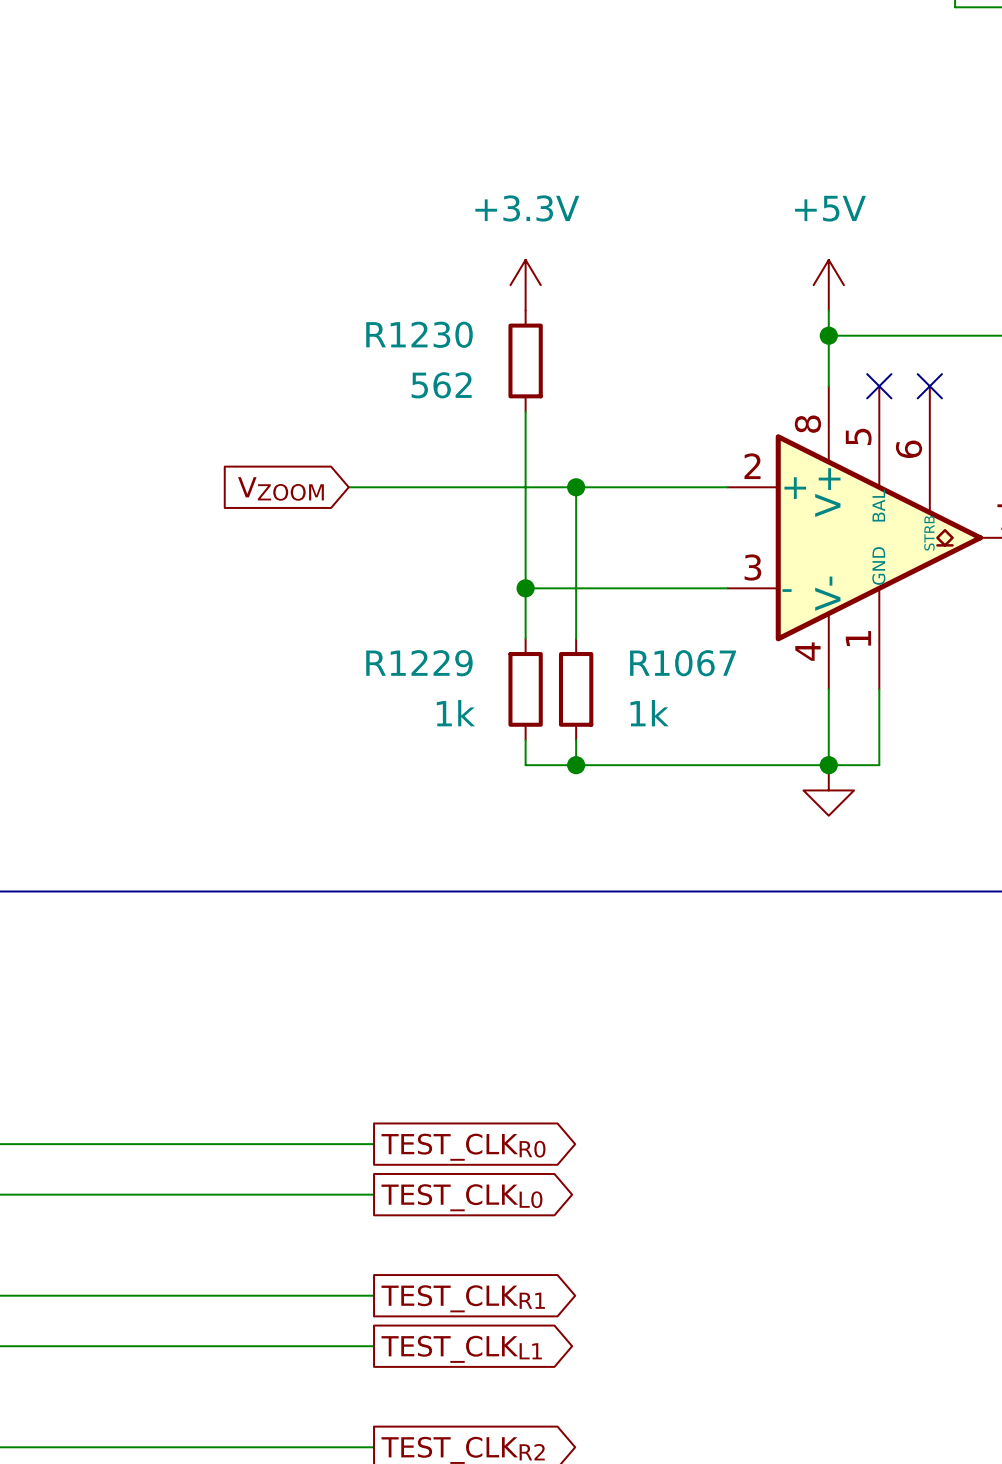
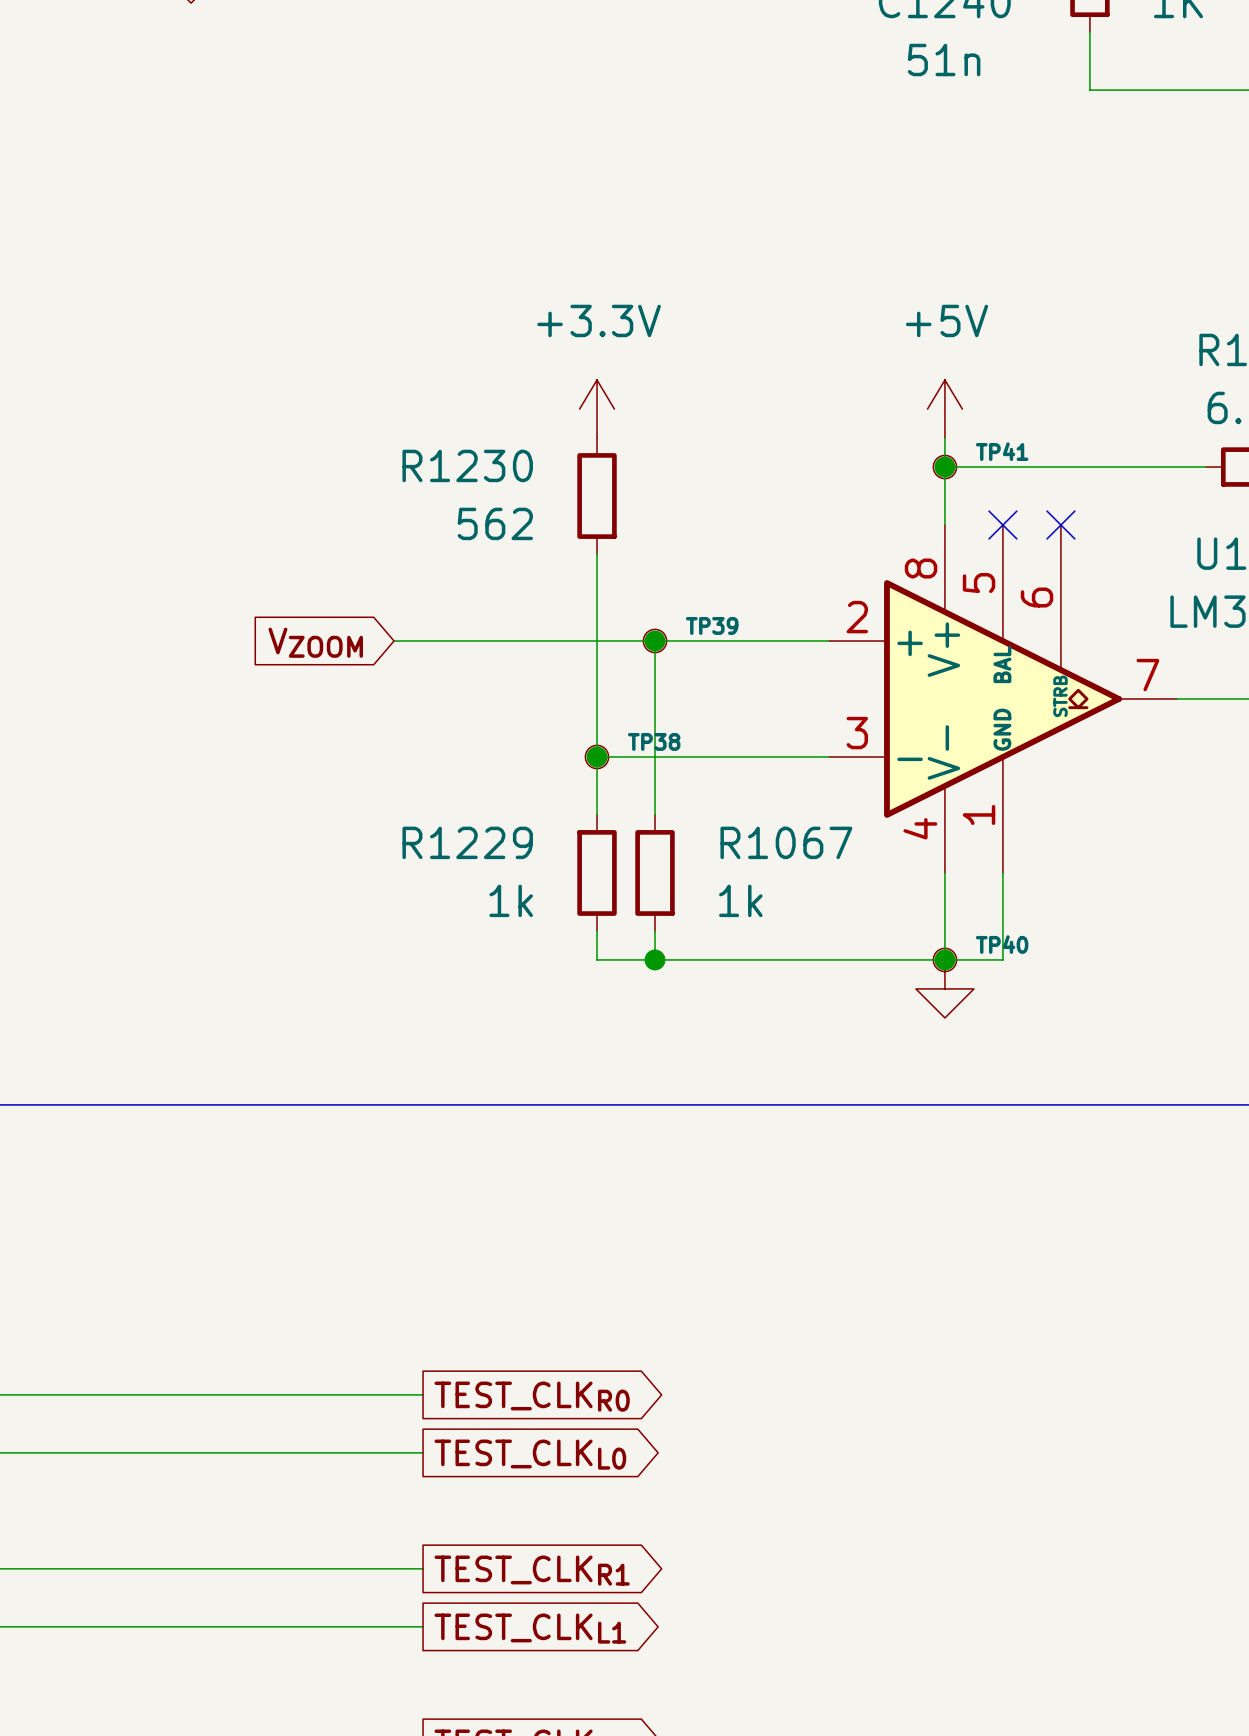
TP41: none -> (944, 467)
TP39: none -> (655, 641)
TP38: none -> (597, 756)
TP40: none -> (944, 959)

